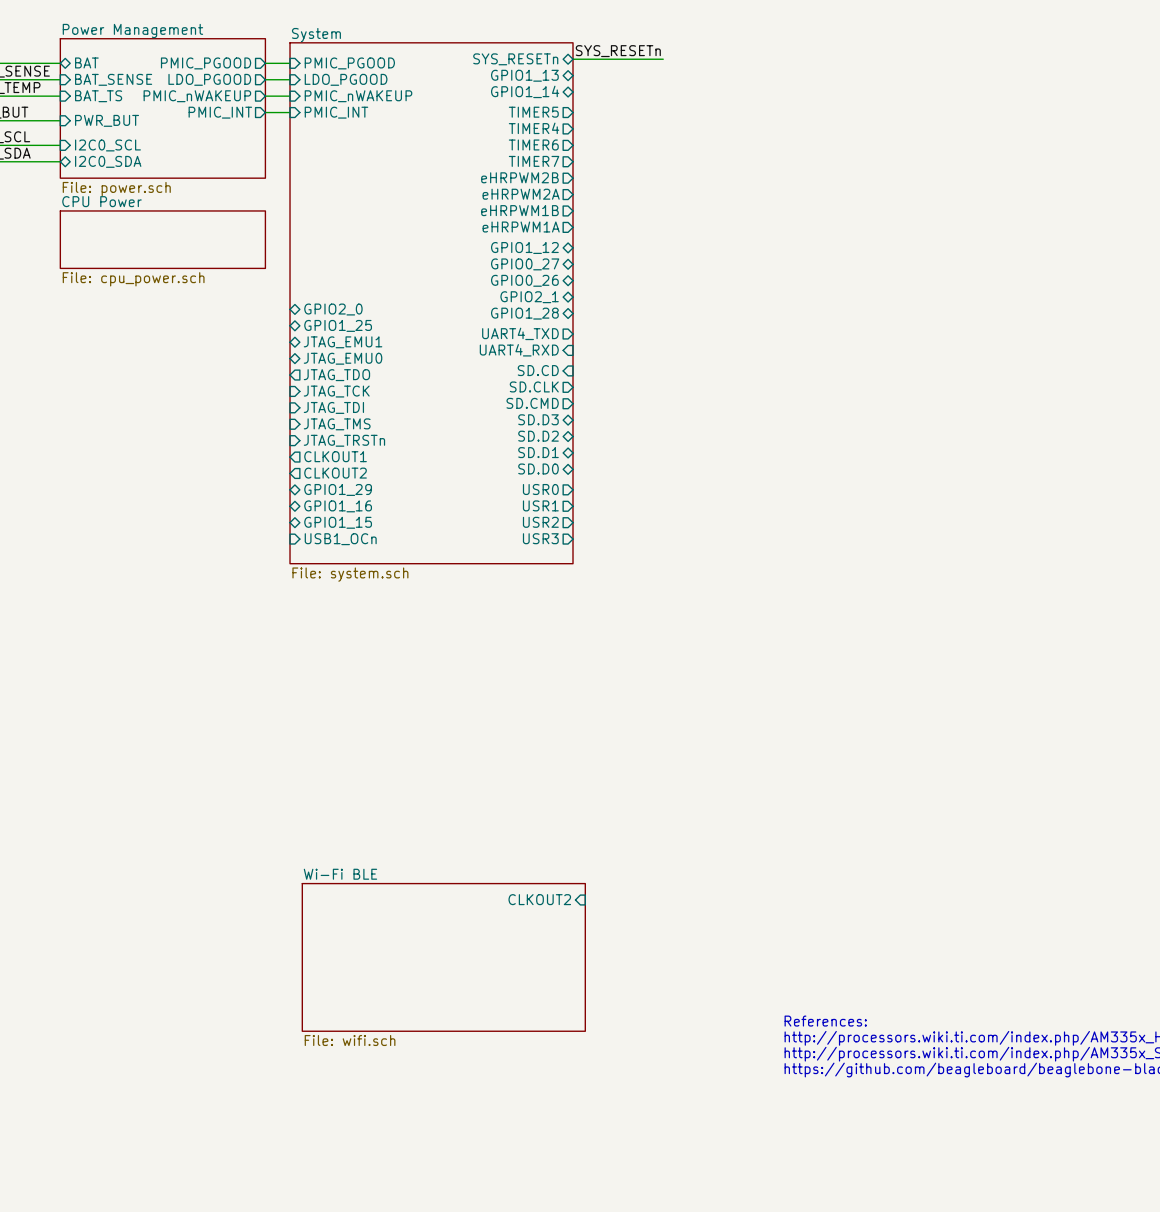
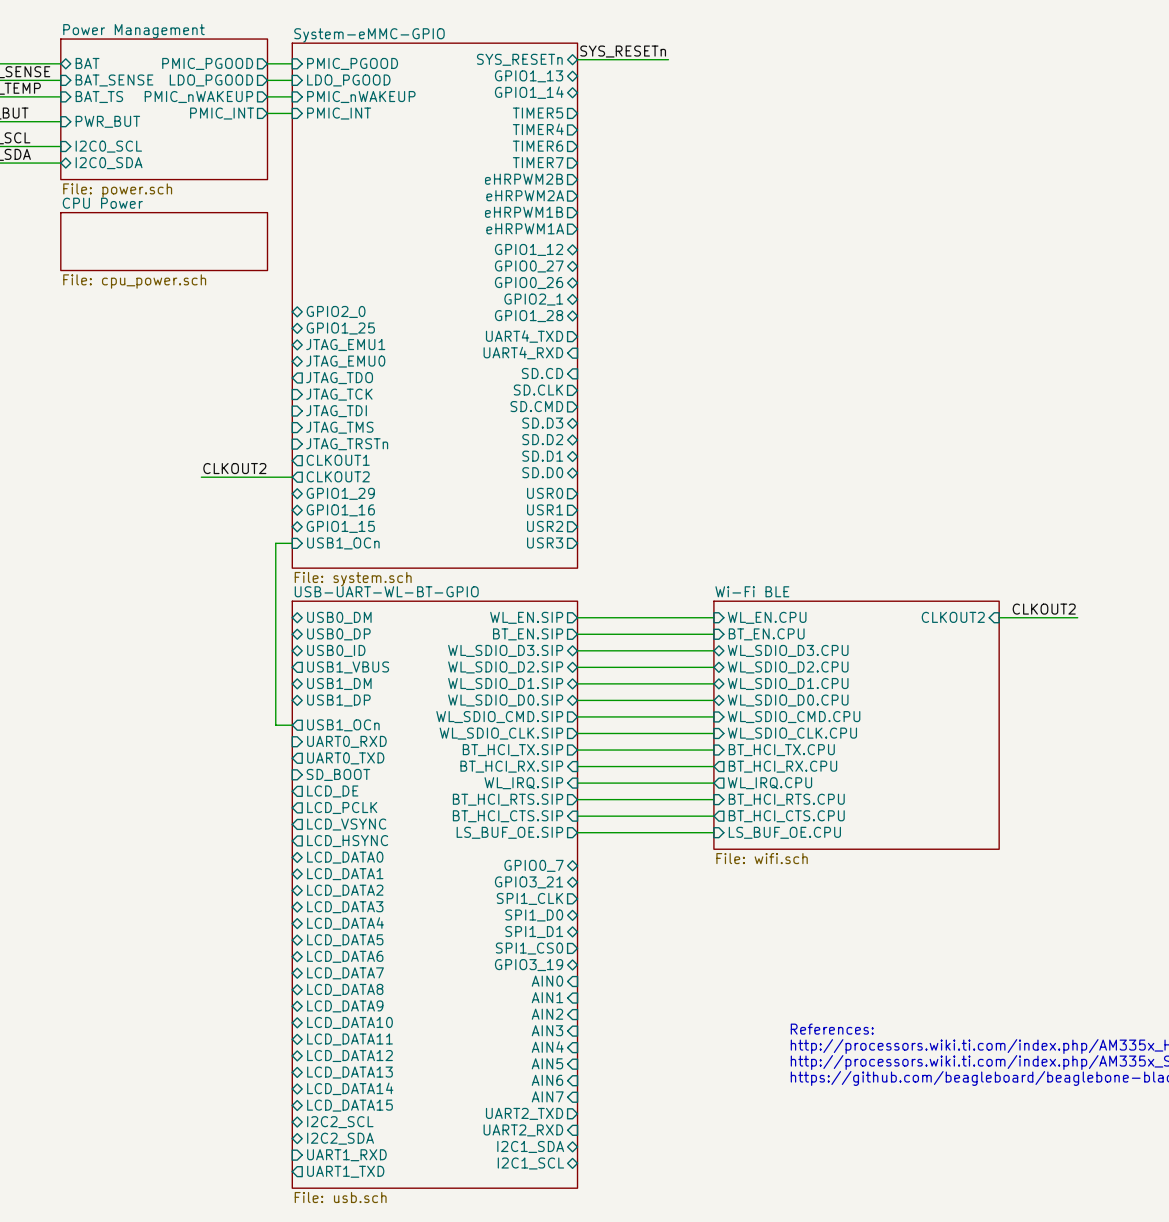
sheet System name: System (316, 35) -> System-eMMC-GPIO (369, 35)
label: none -> CLKOUT2 (234, 468)
wire: none -> (201, 477) (292, 477)
wire: none -> (292, 543) (275, 543) (275, 725) (292, 725)
label: none -> CLKOUT2 (1044, 609)
wire: none -> (577, 617) (713, 617)
sheet pin: none -> CLKOUT2 (953, 617)
wire: none -> (999, 617) (1077, 617)
sheet pin: none -> USB0_DM (339, 617)
sheet pin: none -> WL_EN.SIP (526, 617)
sheet pin: none -> WL_EN.CPU (767, 617)
sheet pin: none -> USB0_DP (338, 634)
sheet pin: none -> BT_EN.SIP (528, 634)
wire: none -> (577, 634) (713, 634)
sheet pin: none -> BT_EN.CPU (766, 634)
sheet pin: none -> USB0_ID (336, 650)
sheet pin: none -> WL_SDIO_D3.SIP (505, 650)
wire: none -> (577, 650) (713, 650)
sheet pin: none -> WL_SDIO_D3.CPU (788, 650)
sheet pin: none -> USB1_VBUS (348, 667)
sheet pin: none -> WL_SDIO_D2.SIP (505, 667)
wire: none -> (577, 667) (713, 667)
sheet pin: none -> WL_SDIO_D2.CPU (788, 667)
sheet pin: none -> USB1_DM (339, 683)
sheet pin: none -> WL_SDIO_D1.SIP (505, 683)
wire: none -> (577, 683) (713, 683)
sheet pin: none -> WL_SDIO_D1.CPU (788, 683)
wire: none -> (577, 700) (713, 700)
sheet pin: none -> USB1_DP (338, 700)
sheet pin: none -> WL_SDIO_D0.SIP (505, 700)
sheet pin: none -> WL_SDIO_D0.CPU (788, 700)
sheet pin: none -> WL_SDIO_CMD.SIP (499, 717)
wire: none -> (577, 716) (713, 716)
sheet pin: none -> WL_SDIO_CMD.CPU (794, 717)
sheet pin: none -> USB1_OCn (343, 725)
sheet Wi-Fi BLE: none -> File: wifi.sch (856, 725)
sheet pin: none -> WL_SDIO_CLK.SIP (501, 733)
wire: none -> (577, 733) (713, 733)
sheet pin: none -> WL_SDIO_CLK.CPU (792, 733)
sheet pin: none -> UART0_RXD (346, 741)
sheet pin: none -> BT_HCI_TX.SIP (512, 750)
wire: none -> (577, 750) (713, 750)
sheet pin: none -> BT_HCI_TX.CPU (781, 750)
sheet pin: none -> UART0_TXD (345, 758)
sheet pin: none -> BT_HCI_RX.SIP (511, 766)
wire: none -> (577, 766) (713, 766)
sheet pin: none -> BT_HCI_RX.CPU (782, 766)
sheet pin: none -> SD_BOOT (338, 774)
wire: none -> (577, 783) (713, 783)
sheet pin: none -> WL_IRQ.SIP (523, 783)
sheet pin: none -> WL_IRQ.CPU (769, 783)
sheet pin: none -> LCD_DE (332, 791)
sheet pin: none -> BT_HCI_RTS.SIP (508, 799)
wire: none -> (577, 799) (713, 799)
sheet pin: none -> BT_HCI_RTS.CPU (786, 799)
sheet pin: none -> LCD_PCLK (342, 807)
sheet pin: none -> BT_HCI_CTS.SIP (508, 816)
wire: none -> (577, 816) (713, 816)
sheet pin: none -> BT_HCI_CTS.CPU (786, 816)
sheet pin: none -> LCD_VSYNC (346, 824)
sheet pin: none -> LS_BUF_OE.SIP (509, 832)
wire: none -> (577, 832) (713, 832)
sheet pin: none -> LS_BUF_OE.CPU (784, 832)
sheet pin: none -> LCD_HSYNC (347, 841)
sheet pin: none -> LCD_DATA0 (345, 857)
sheet pin: none -> GPIO0_7 (533, 865)
sheet pin: none -> LCD_DATA1 (345, 874)
sheet pin: none -> GPIO3_21 (529, 882)
sheet pin: none -> LCD_DATA2 (345, 890)
sheet USB-UART-WL-BT-GPIO: none -> File: usb.sch (434, 894)
sheet pin: none -> SPI1_CLK (529, 898)
sheet pin: CLKOUT2 (539, 899) -> none
sheet pin: none -> LCD_DATA3 (345, 907)
sheet pin: none -> SPI1_D0 (534, 915)
sheet pin: none -> LCD_DATA4 (345, 923)
sheet pin: none -> SPI1_D1 (534, 932)
sheet pin: none -> LCD_DATA5 (345, 940)
sheet pin: none -> SPI1_CS0 (529, 948)
sheet pin: none -> LCD_DATA6 (345, 956)
sheet Wi-Fi BLE: File: wifi.sch (443, 957) -> none
sheet pin: none -> GPIO3_19 (529, 965)
sheet pin: none -> LCD_DATA7 (345, 973)
sheet pin: none -> AIN0 (547, 981)
sheet pin: none -> LCD_DATA8 (345, 989)
sheet pin: none -> AIN1 (547, 997)
sheet pin: none -> LCD_DATA9 (345, 1006)
sheet pin: none -> AIN2 (547, 1014)
sheet pin: none -> LCD_DATA10 (349, 1022)
sheet pin: none -> AIN3 (547, 1030)
sheet pin: none -> LCD_DATA11 (349, 1039)
sheet pin: none -> AIN4 (547, 1047)
sheet pin: none -> LCD_DATA12 (349, 1056)
sheet pin: none -> AIN5 (547, 1063)
sheet pin: none -> LCD_DATA13 (349, 1072)
sheet pin: none -> AIN6 (547, 1080)
sheet pin: none -> LCD_DATA14 (350, 1088)
sheet pin: none -> AIN7 (547, 1096)
sheet pin: none -> LCD_DATA15 (349, 1105)
sheet pin: none -> UART2_TXD (524, 1113)
sheet pin: none -> I2C2_SCL (340, 1122)
sheet pin: none -> UART2_RXD (523, 1130)
sheet pin: none -> I2C2_SDA (340, 1138)
sheet pin: none -> I2C1_SDA (530, 1146)
sheet pin: none -> UART1_RXD (346, 1155)
sheet pin: none -> I2C1_SCL (530, 1163)
sheet pin: none -> UART1_TXD (345, 1171)

